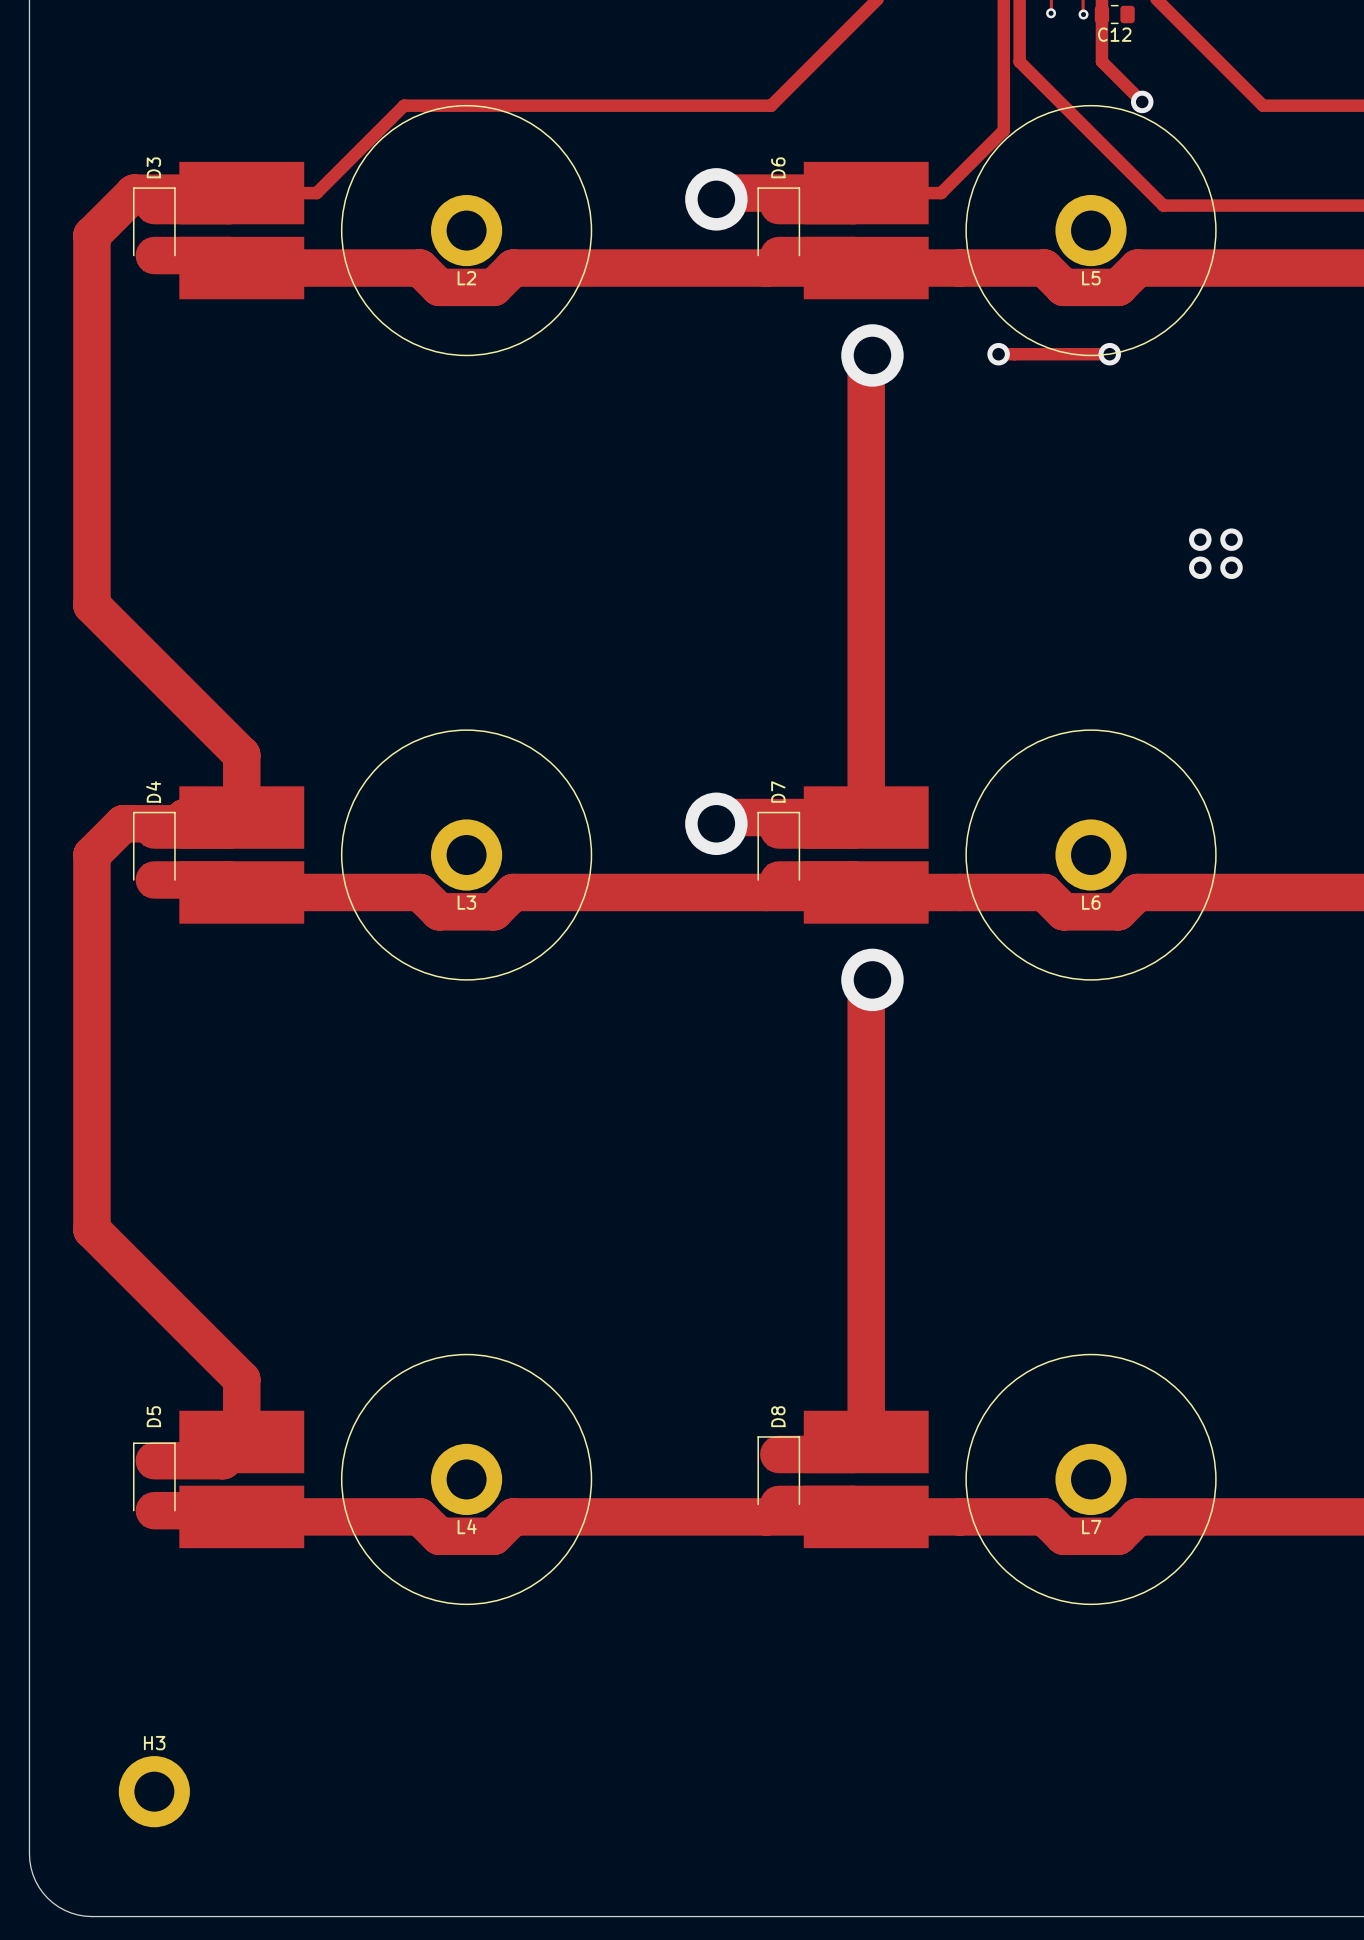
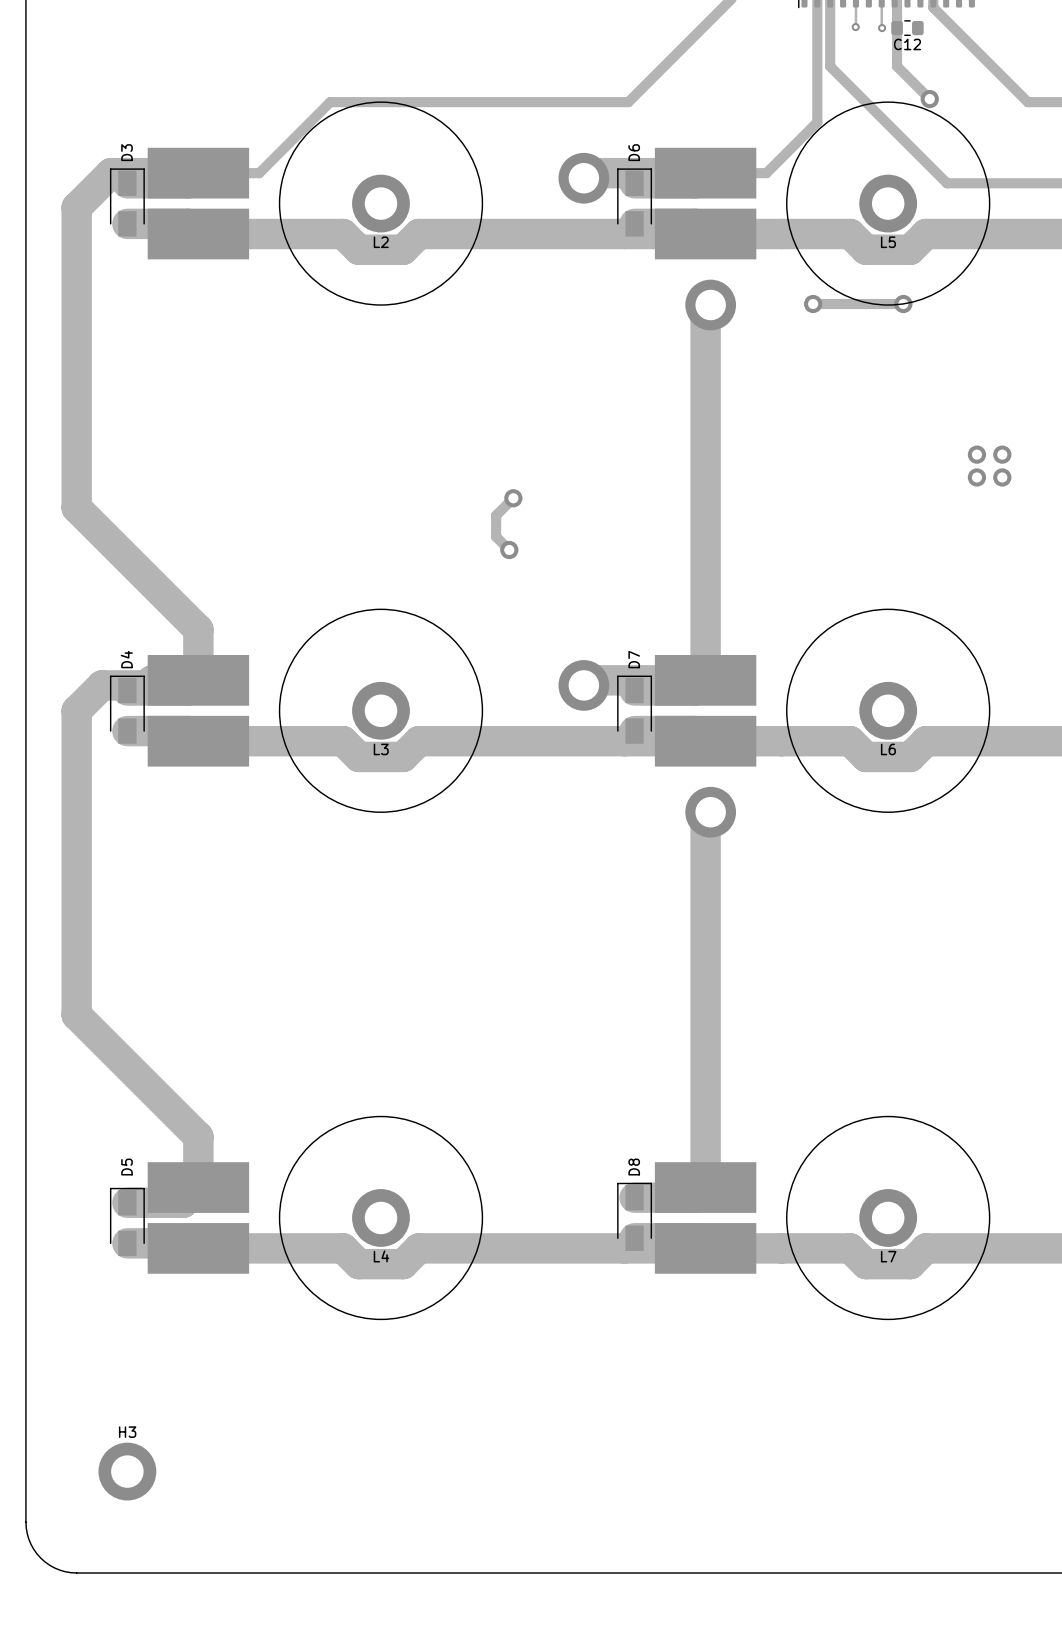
track: none -> (513, 498) (496, 515) (496, 536) (509, 550)
via: none -> (513, 498)
via: none -> (509, 550)

